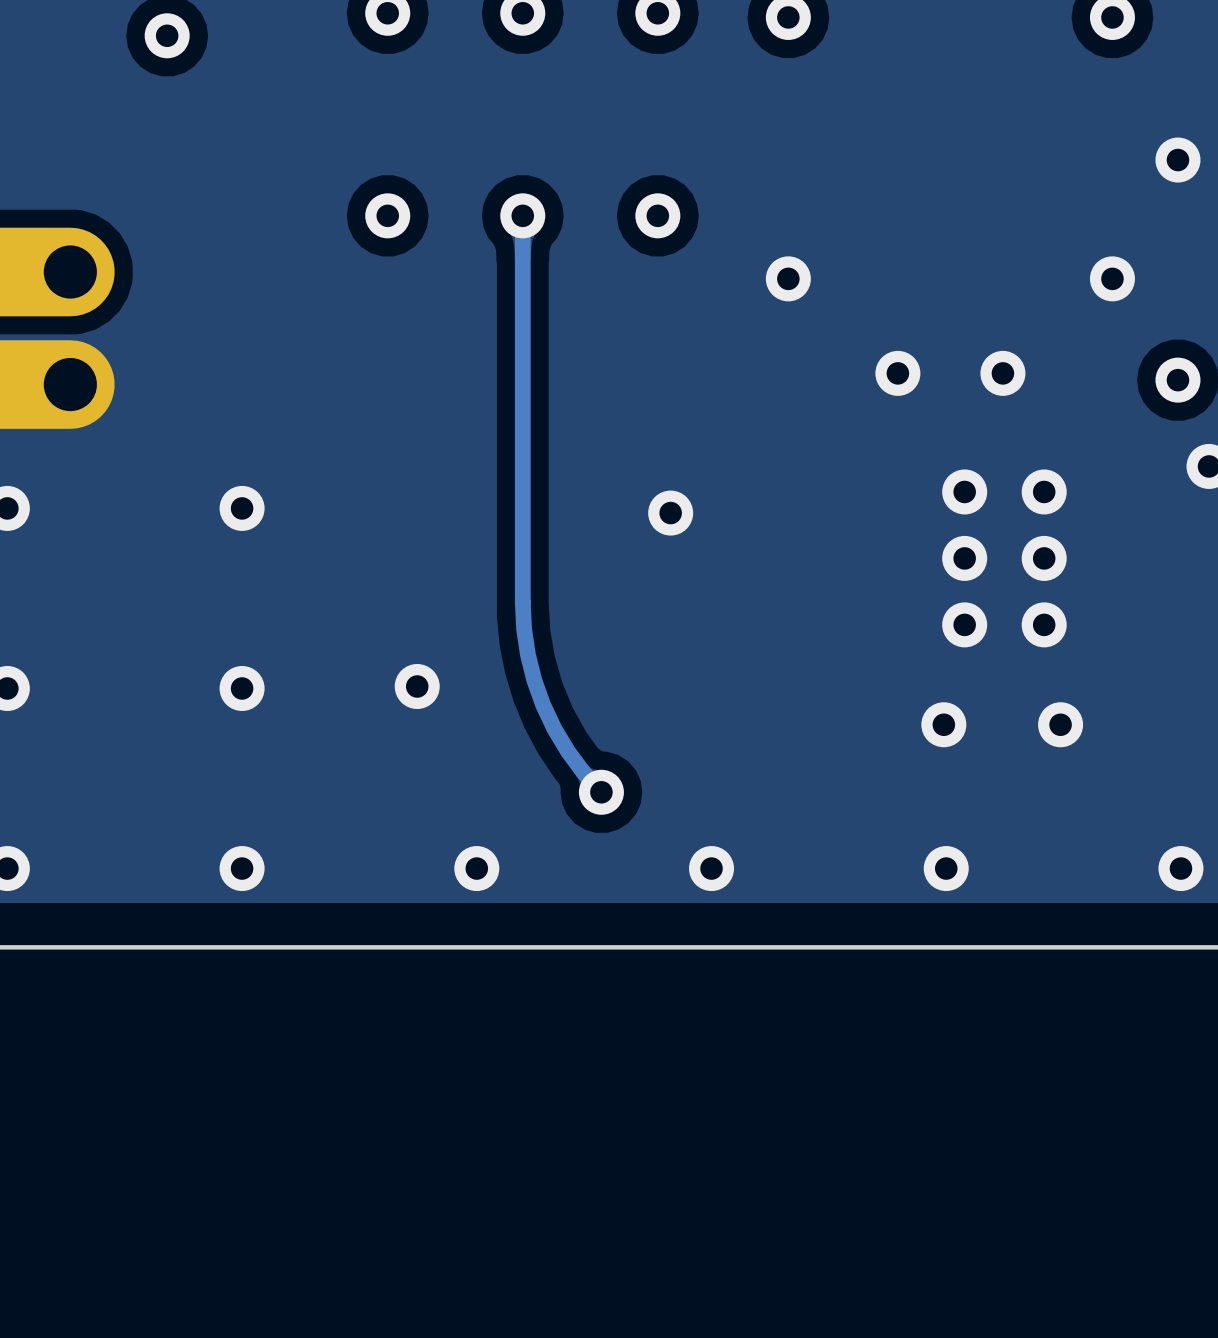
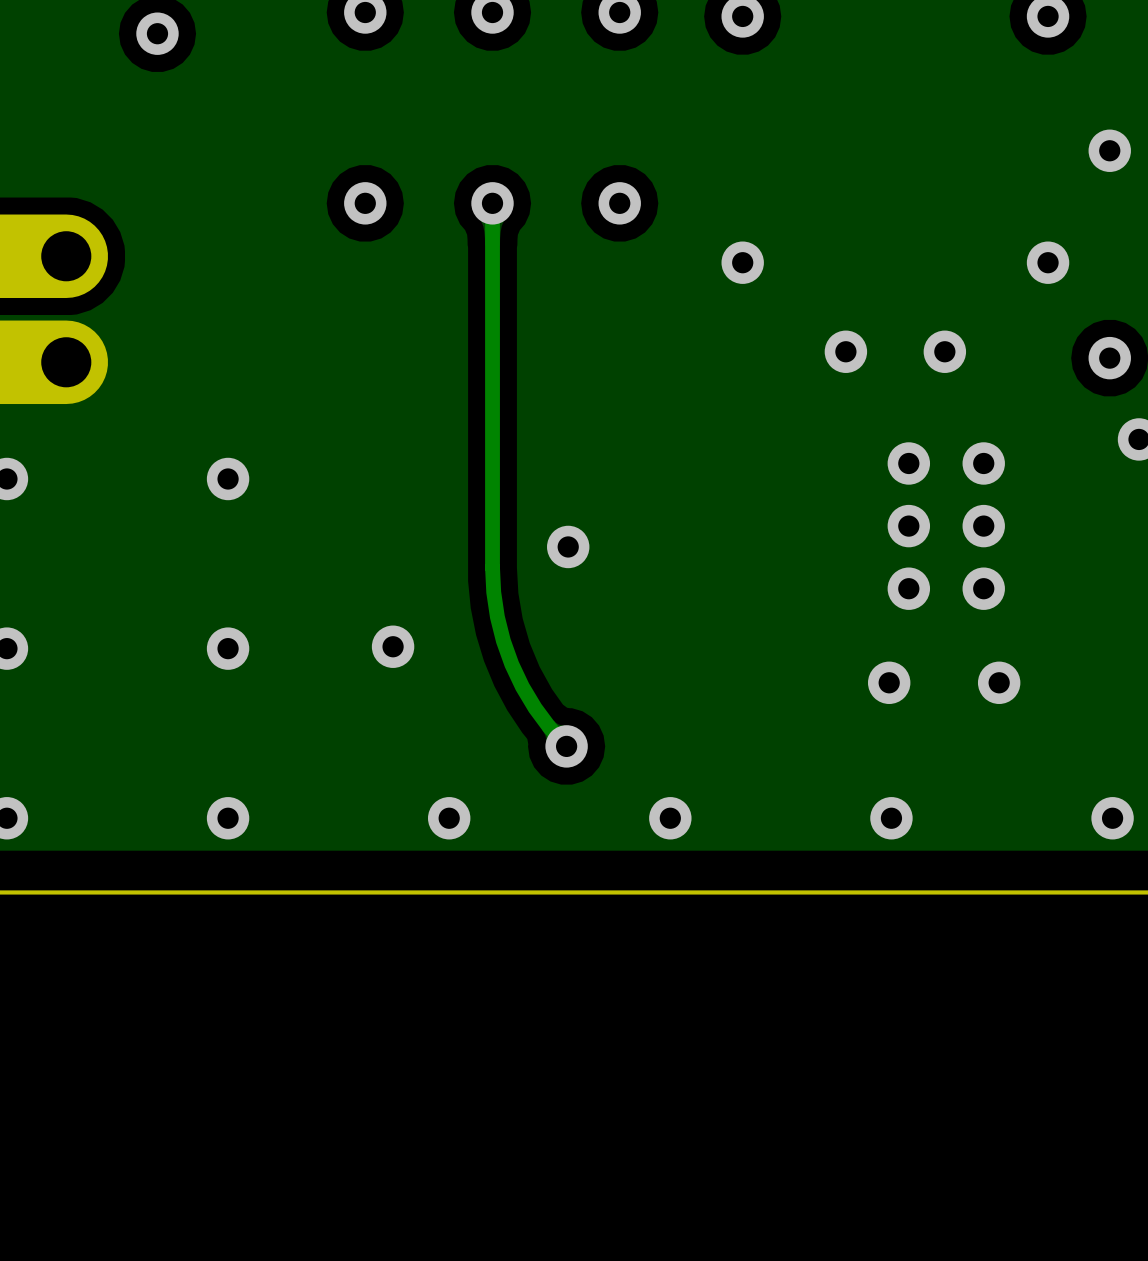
via position: (670, 513) -> (568, 546)

